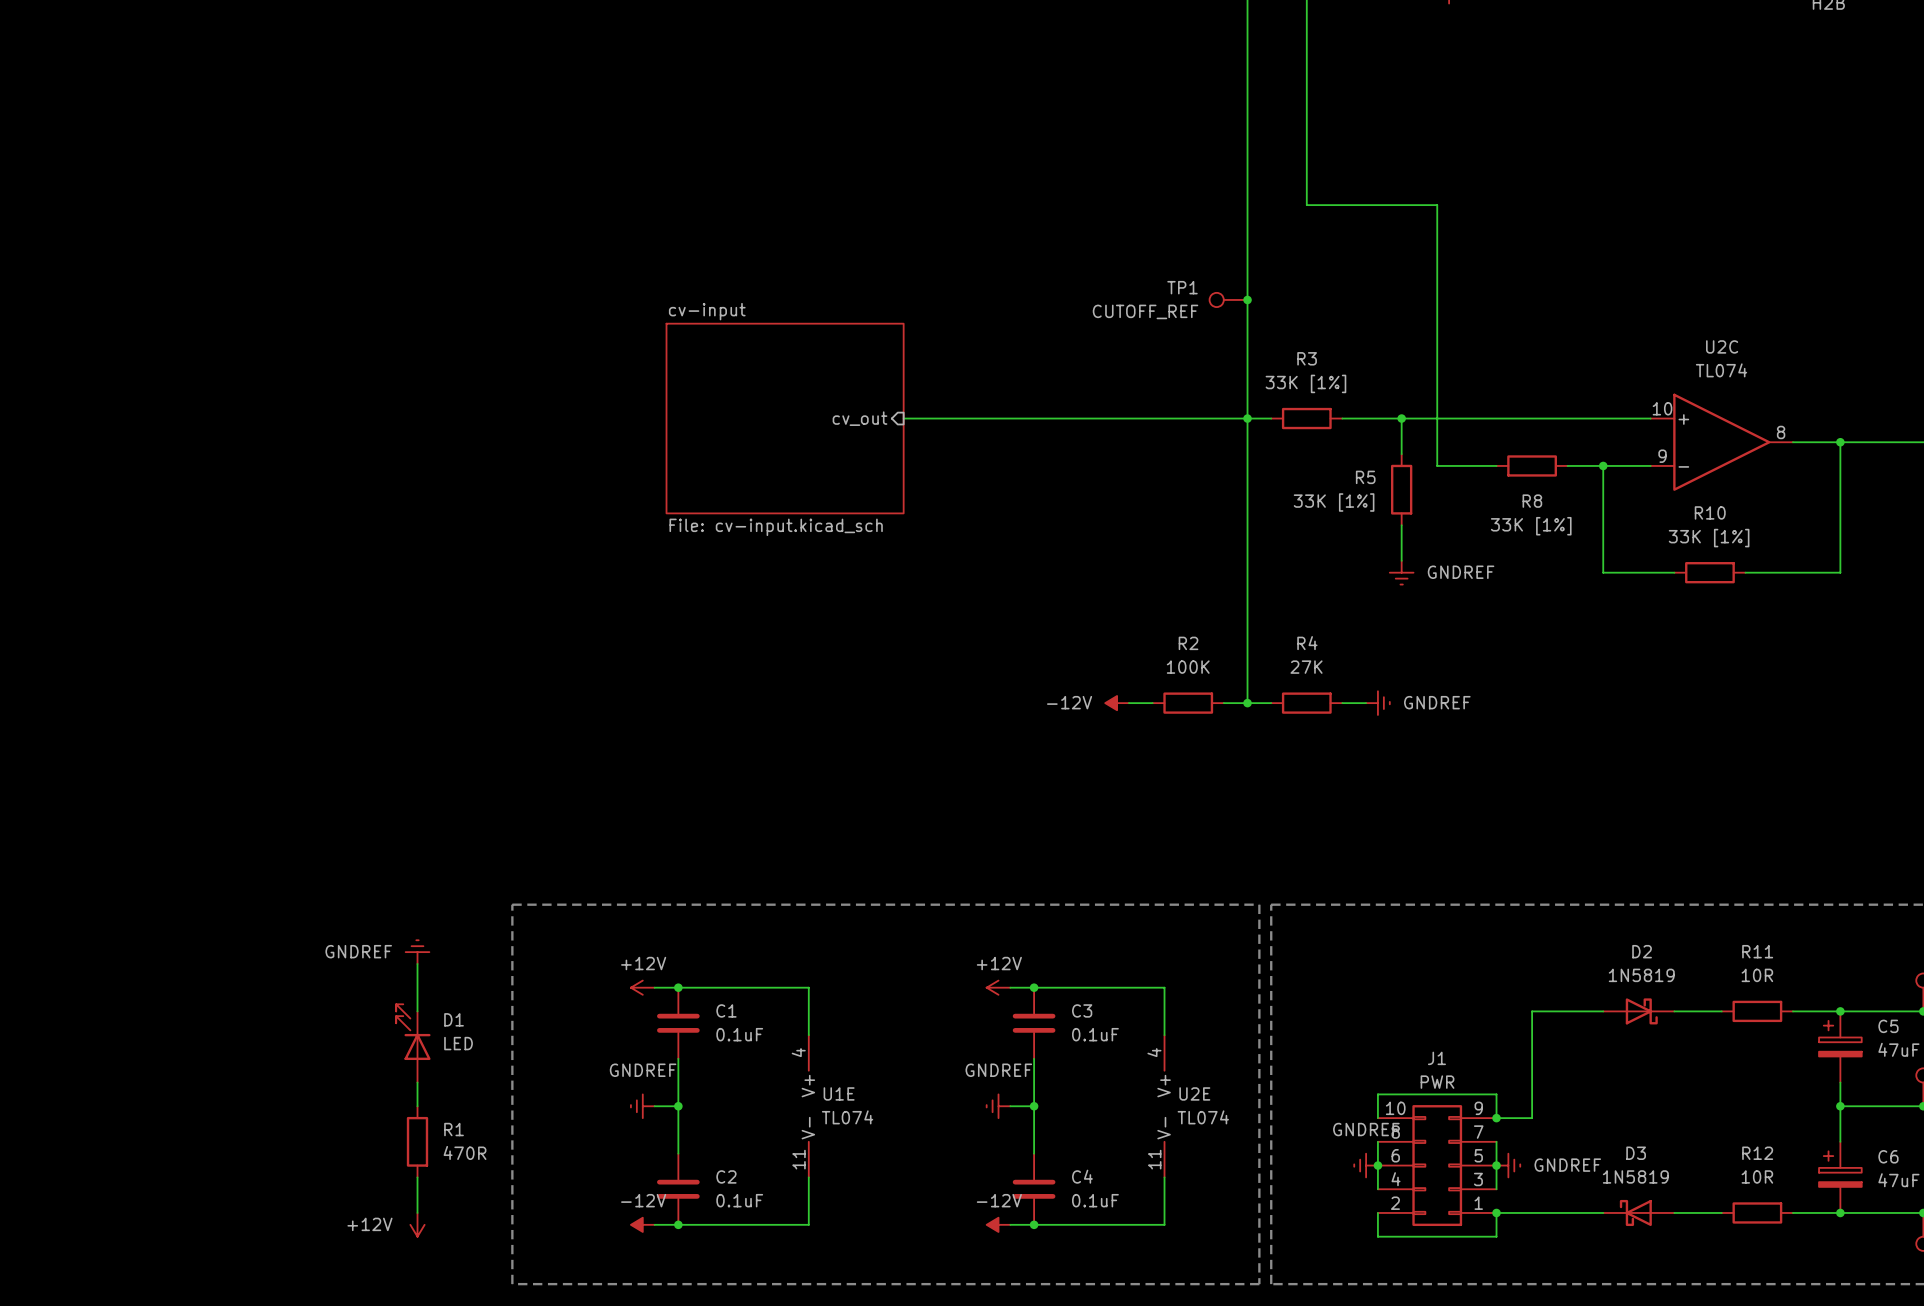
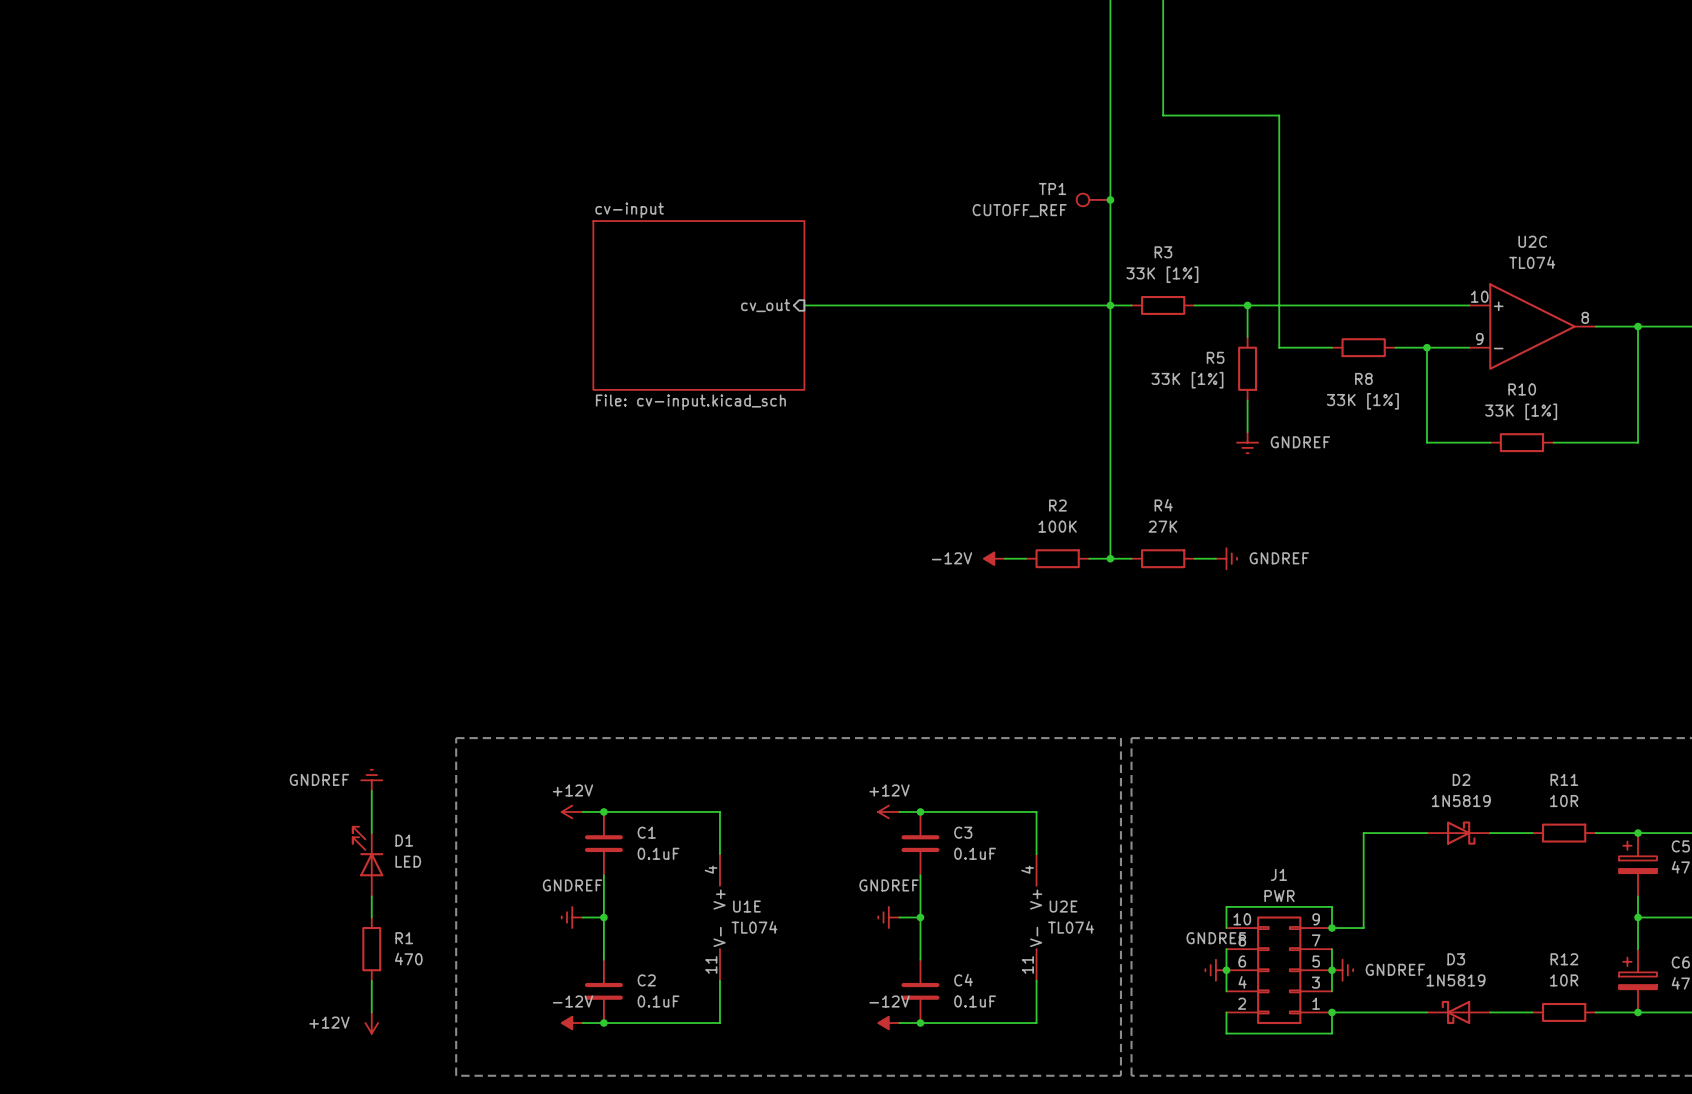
R1 value: 470R (465, 1152) -> 470 (408, 959)

